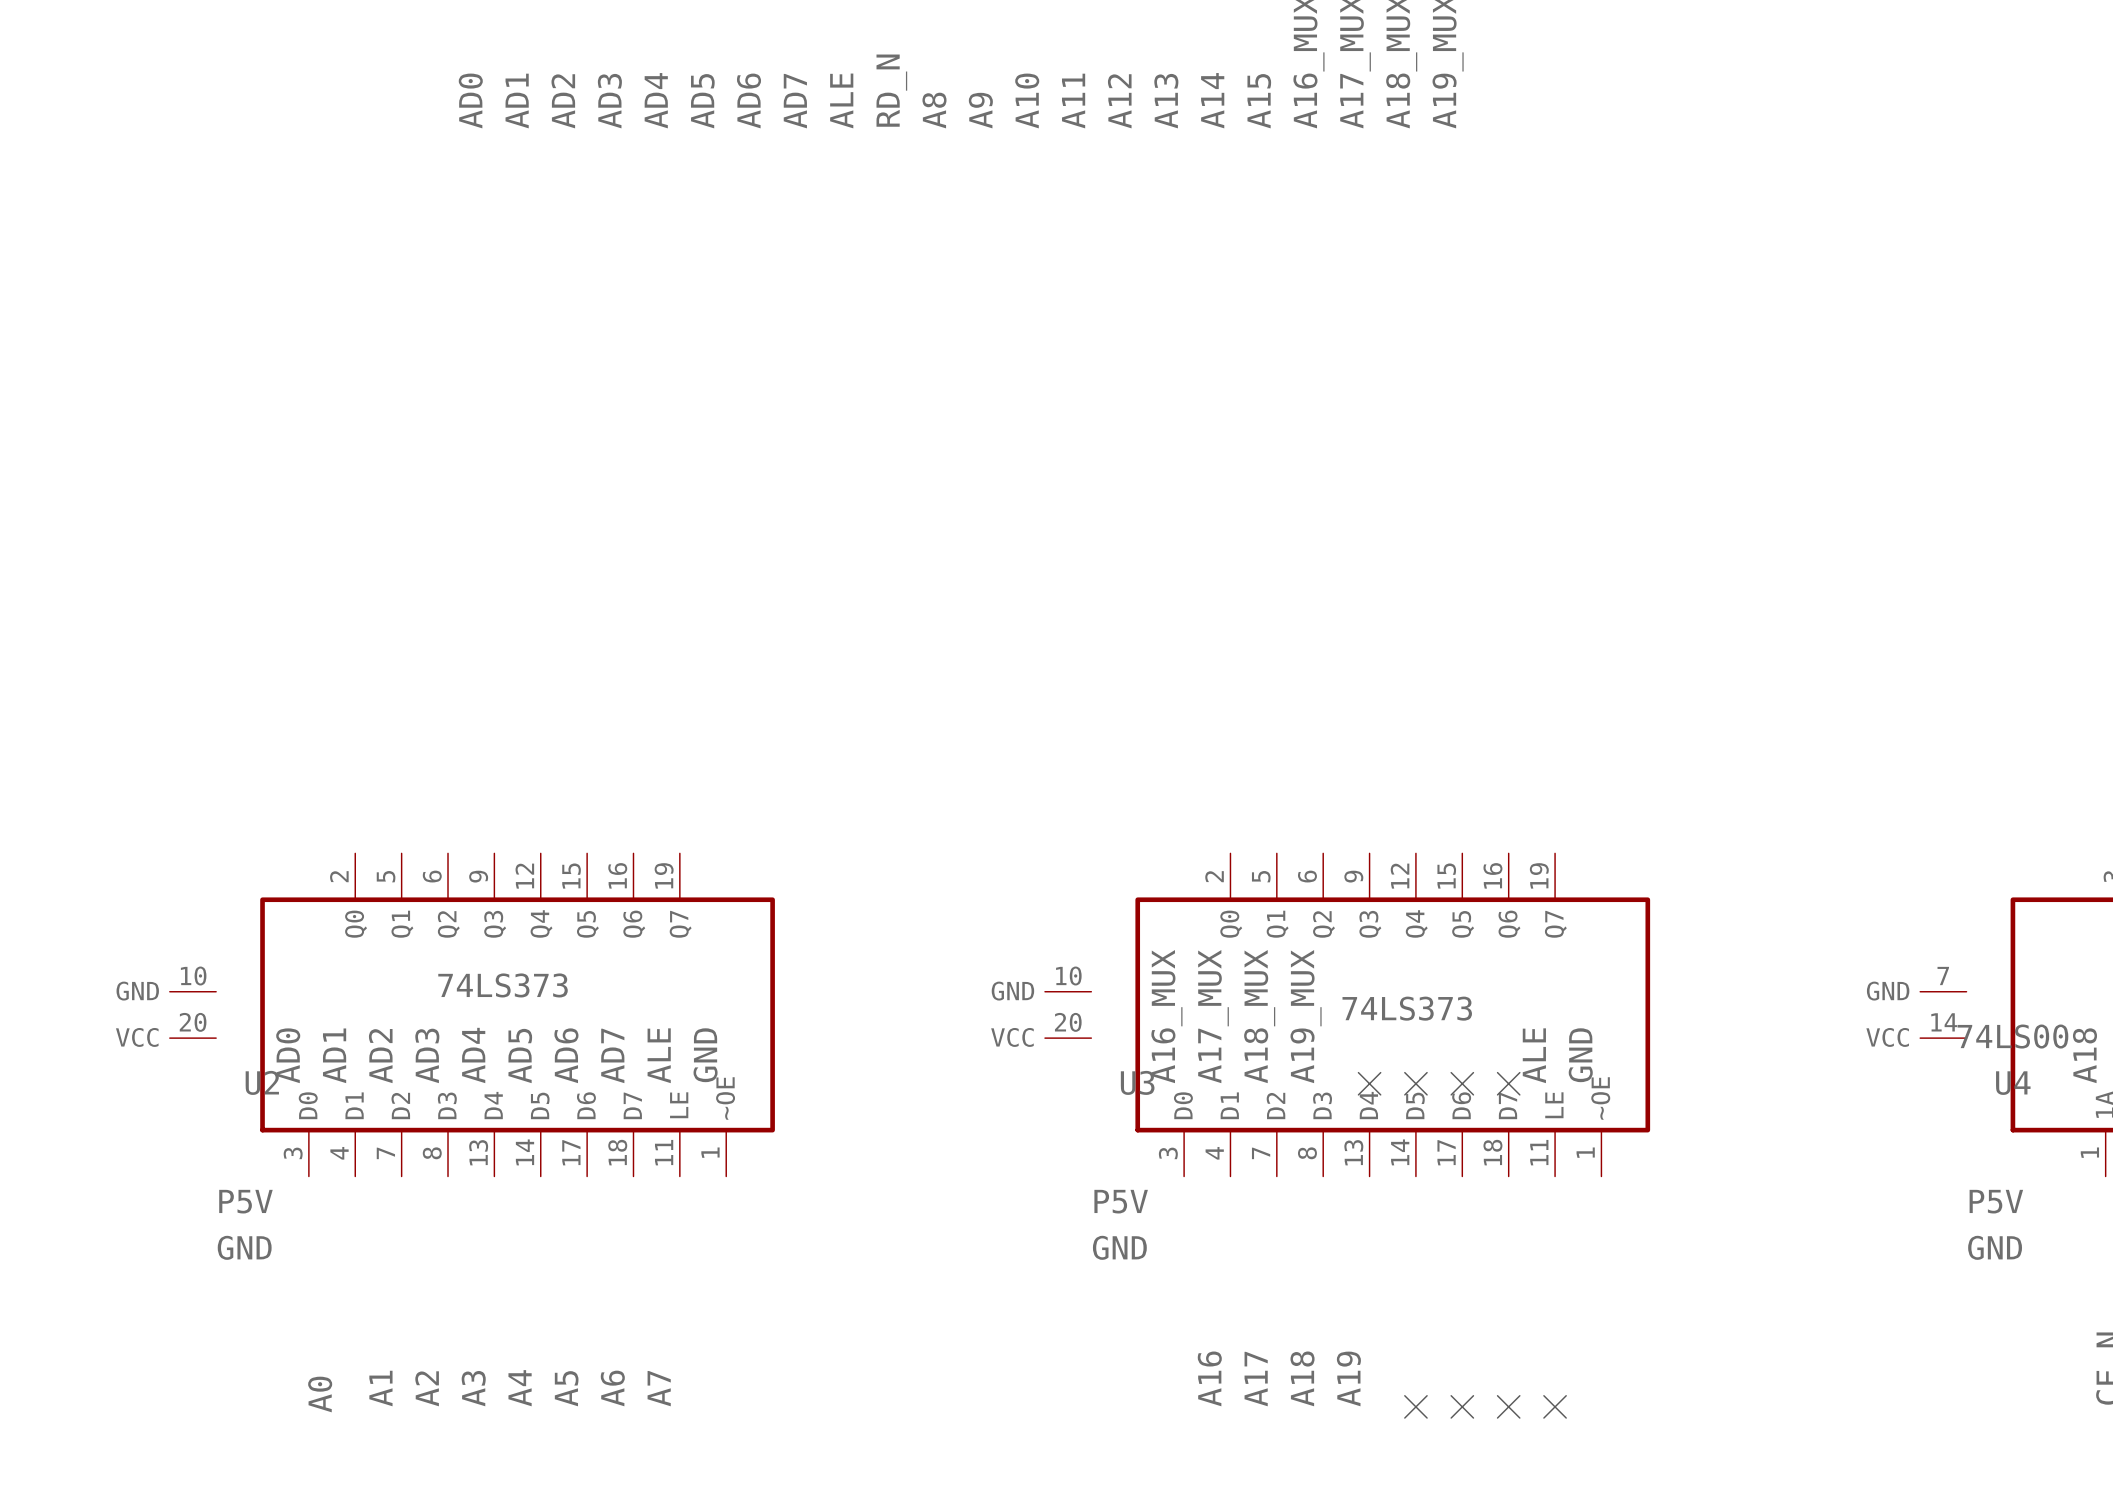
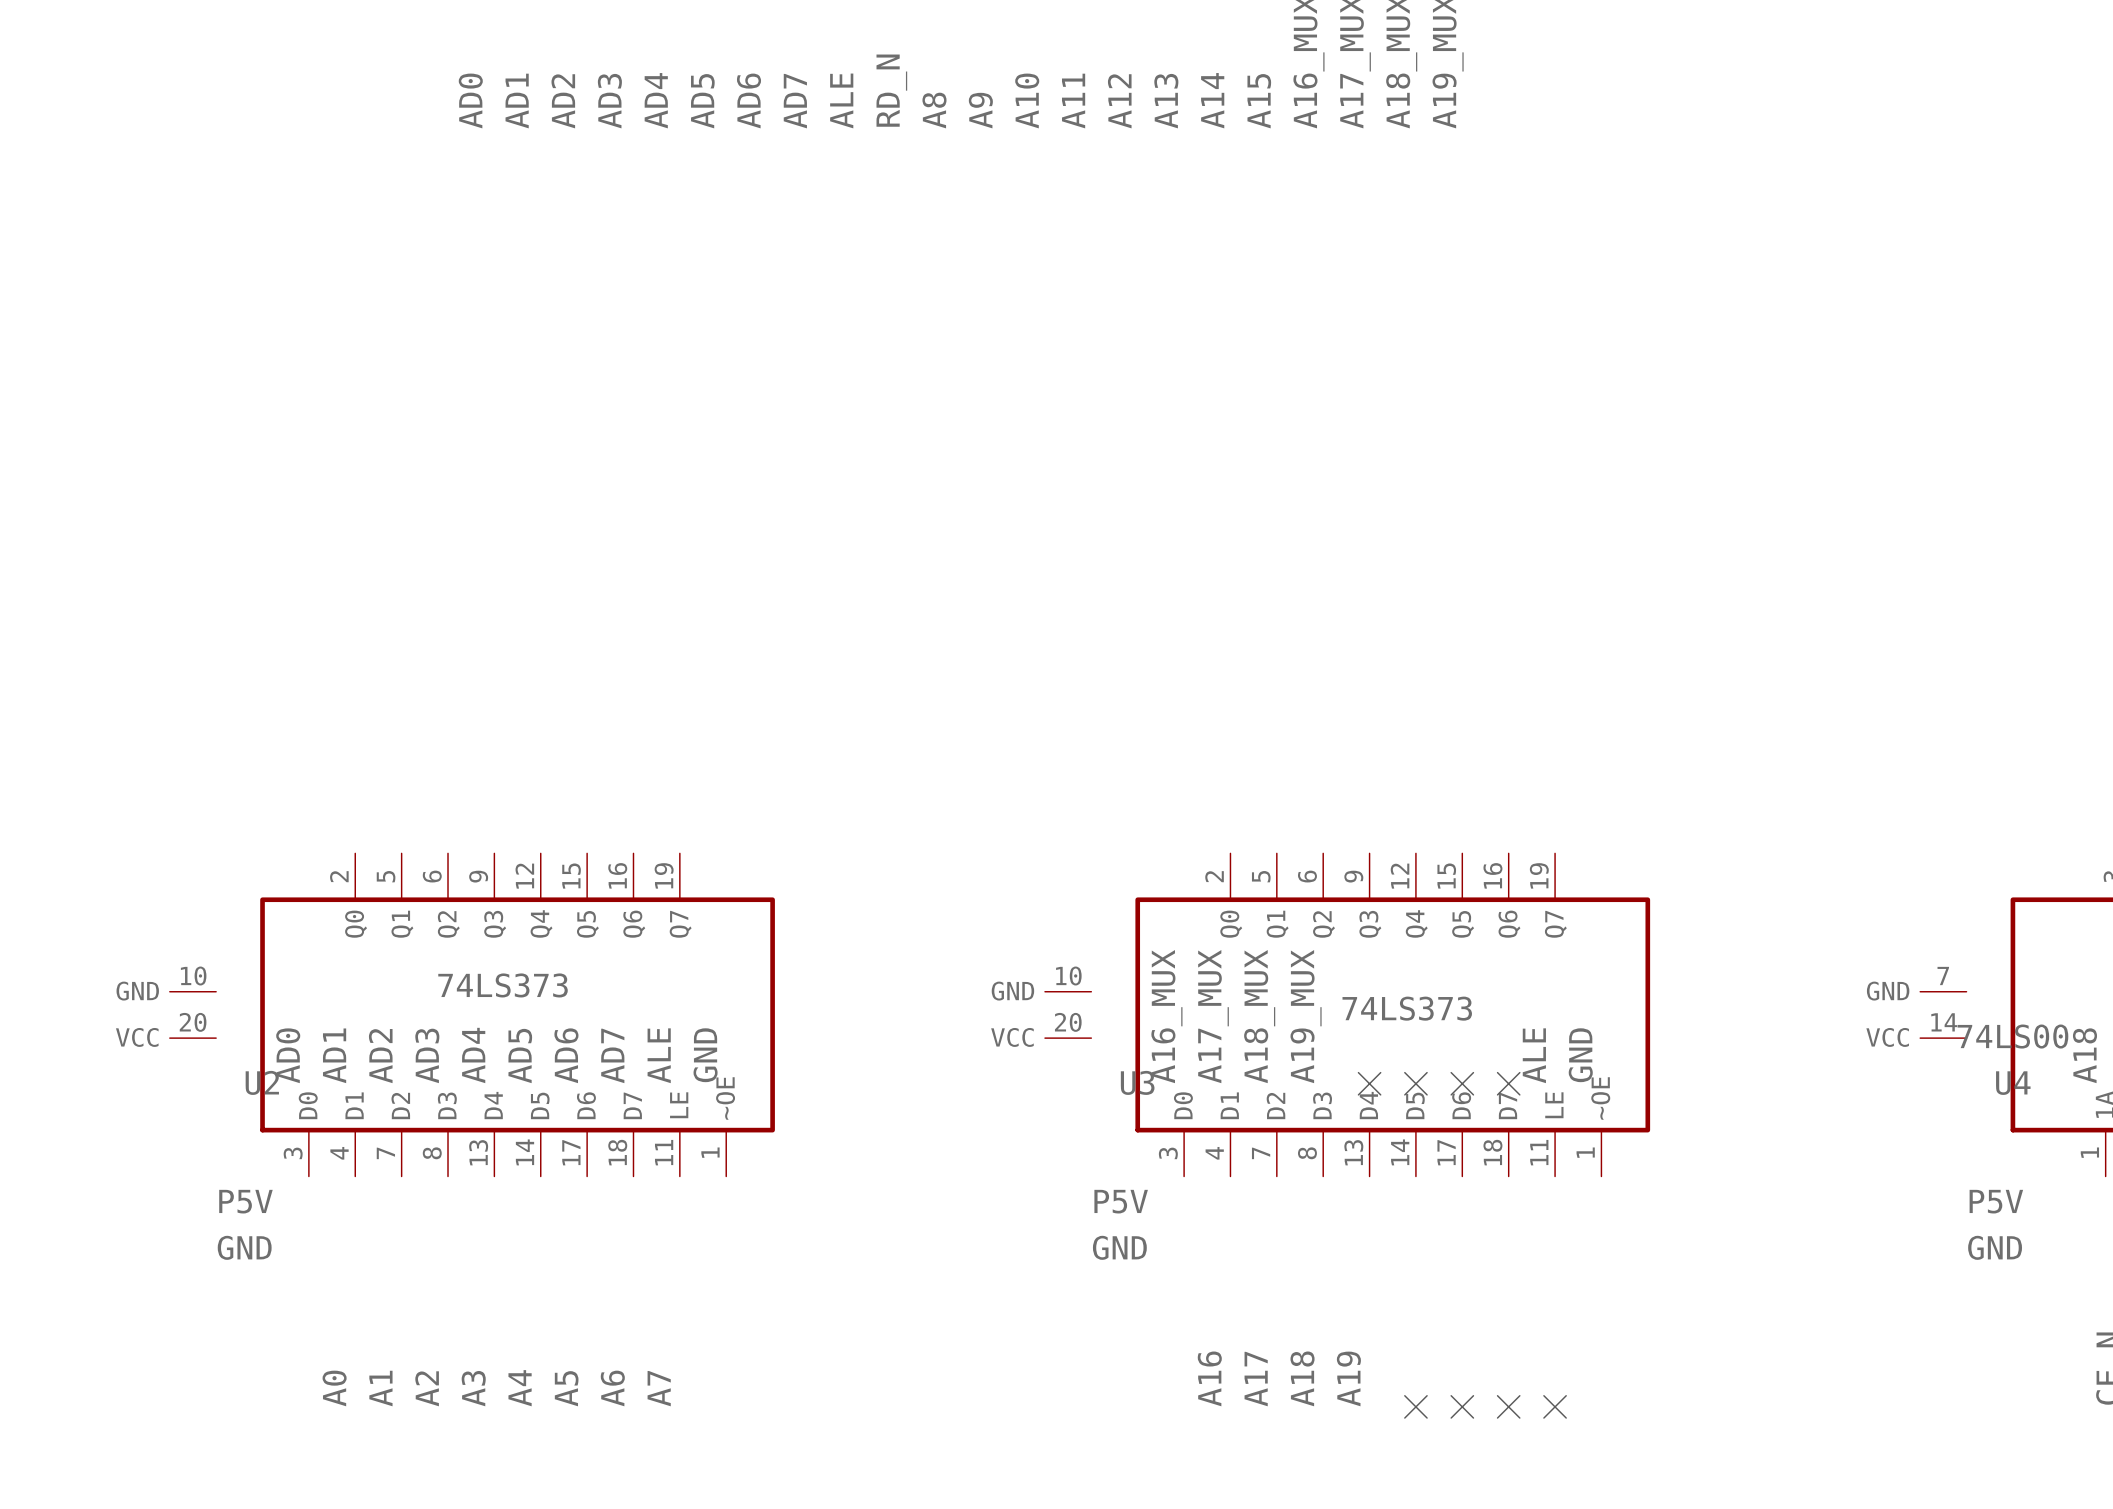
label position: A0 (320, 1394) -> A0 (334, 1388)

